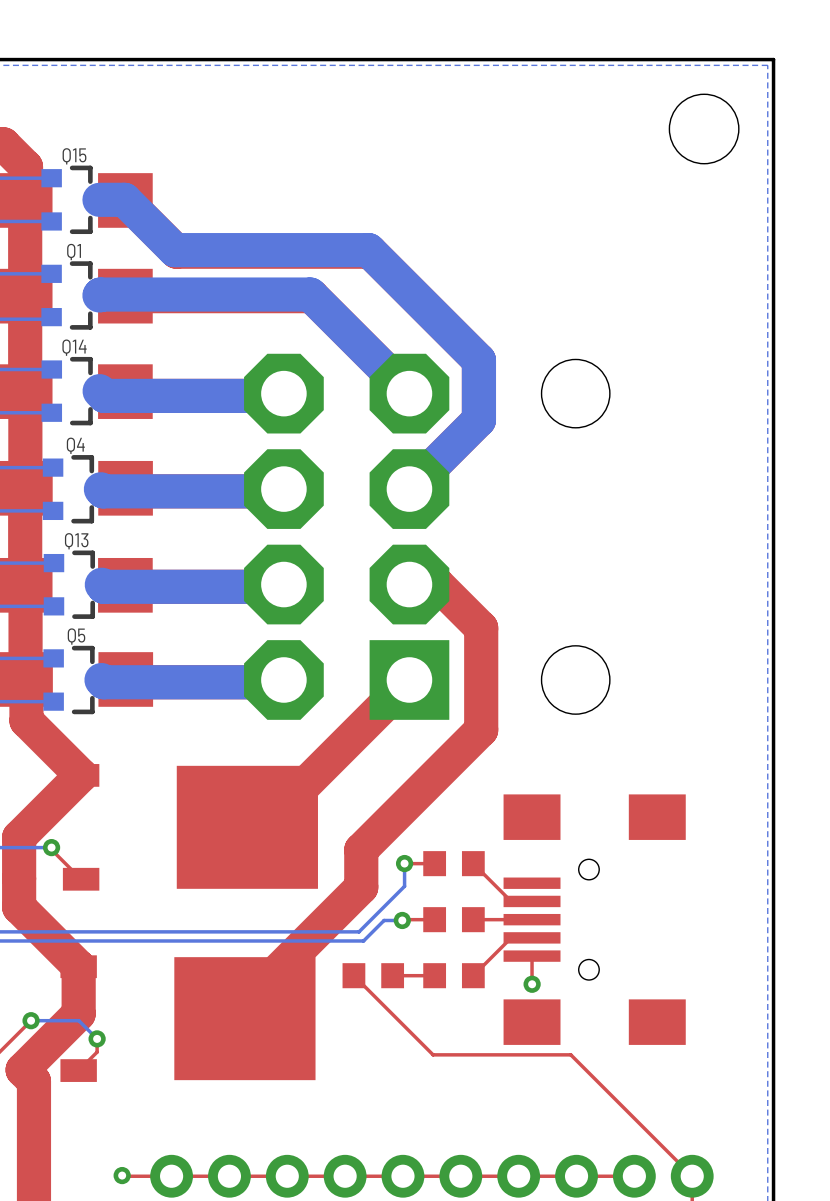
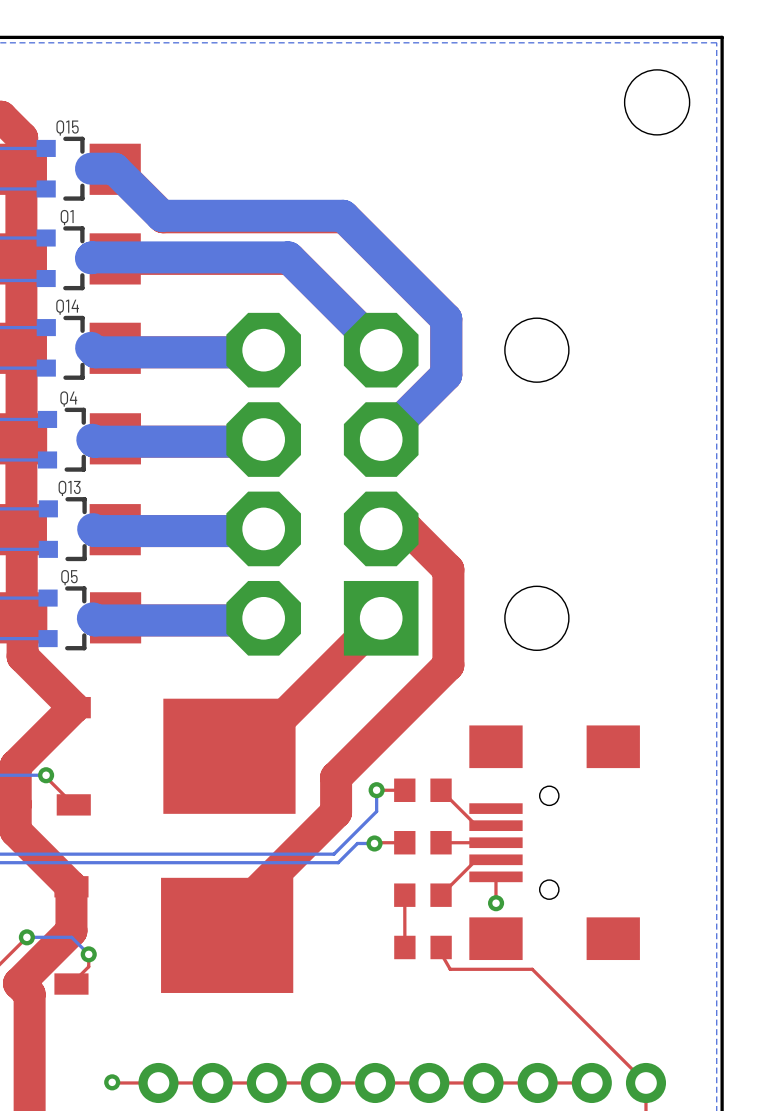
top track: (353, 975) (433, 1054) (483, 1054) -> (441, 947) (441, 953) (450, 969)
part position: (373, 975) -> (423, 947)
top track: (434, 975) (392, 975) -> (404, 895) (404, 947)

